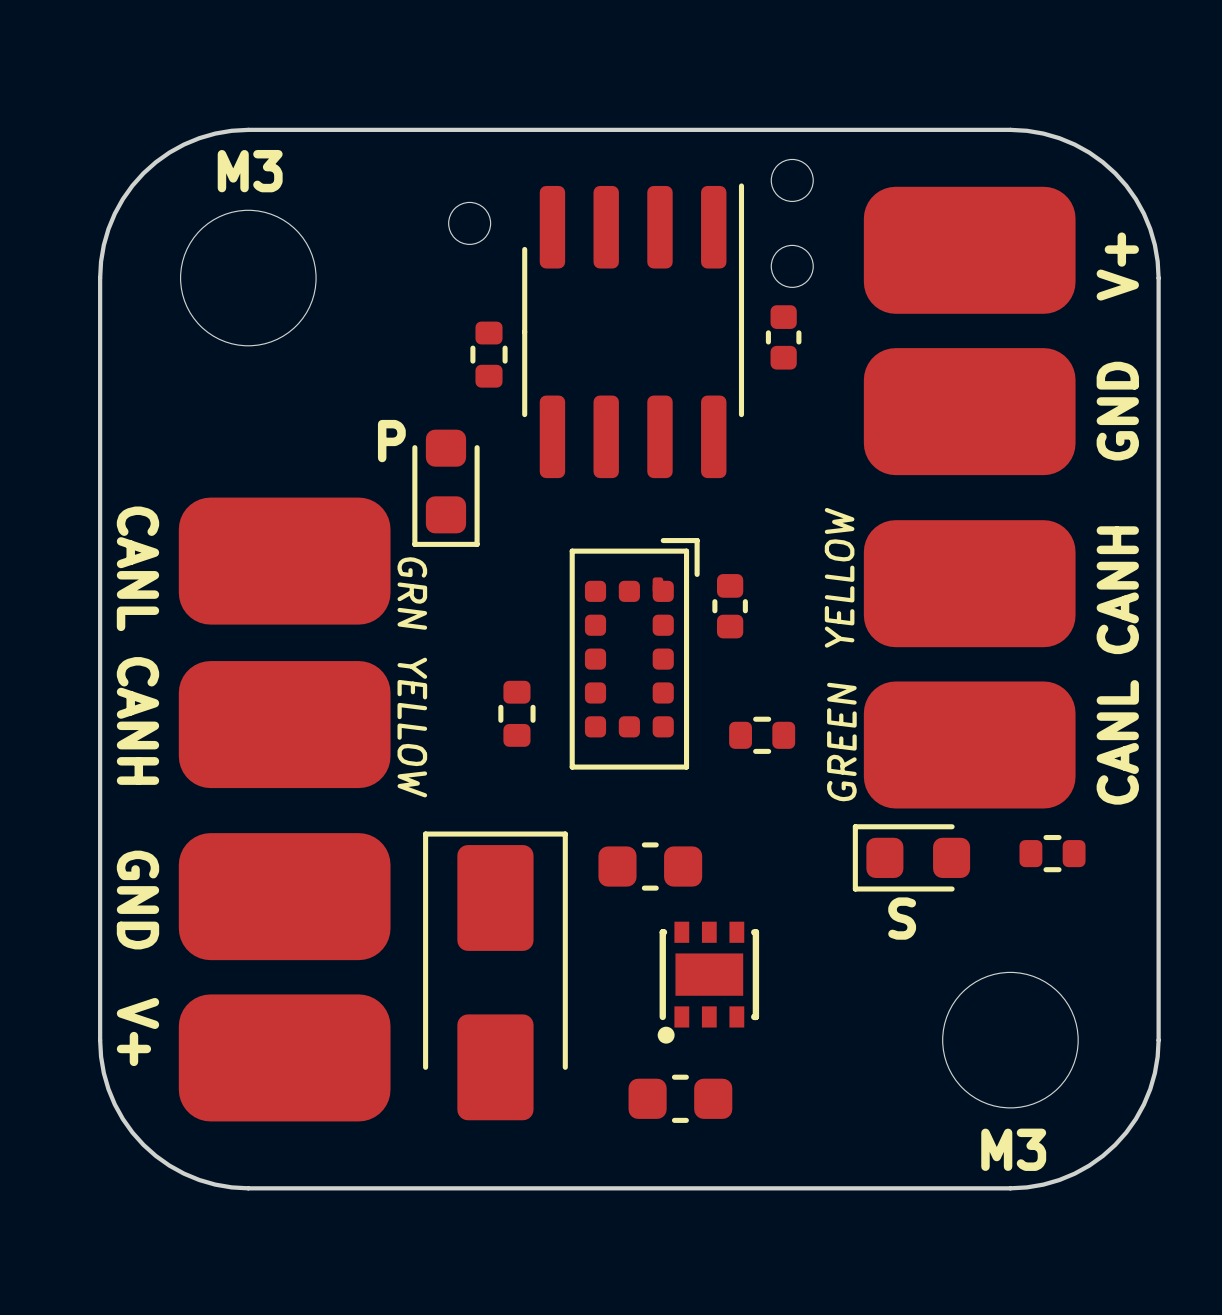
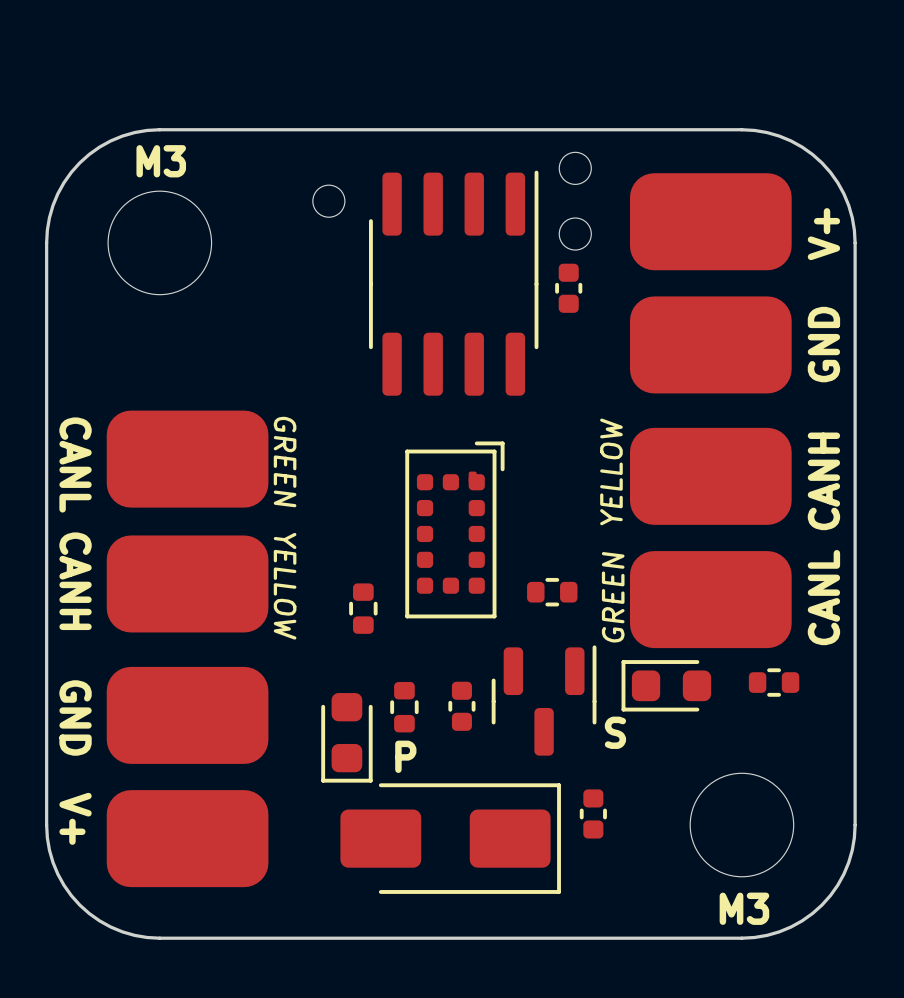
part: (488, 354) -> none
text position: P (391, 441) -> P (405, 756)
part position: (445, 488) -> (346, 737)
text: GRN (412, 593) -> GREEN (285, 461)
part position: (730, 606) -> (593, 813)
part position: (516, 713) -> (363, 608)
part footprint: [598, 842, 703, 891] -> [448, 681, 476, 731]
part: none -> (544, 700)
part: none -> (404, 707)
text position: S (902, 918) -> S (615, 732)
part rotation: 0° (495, 975) -> 90° clockwise (450, 838)
part: (708, 982) -> none
part: (680, 1098) -> none

